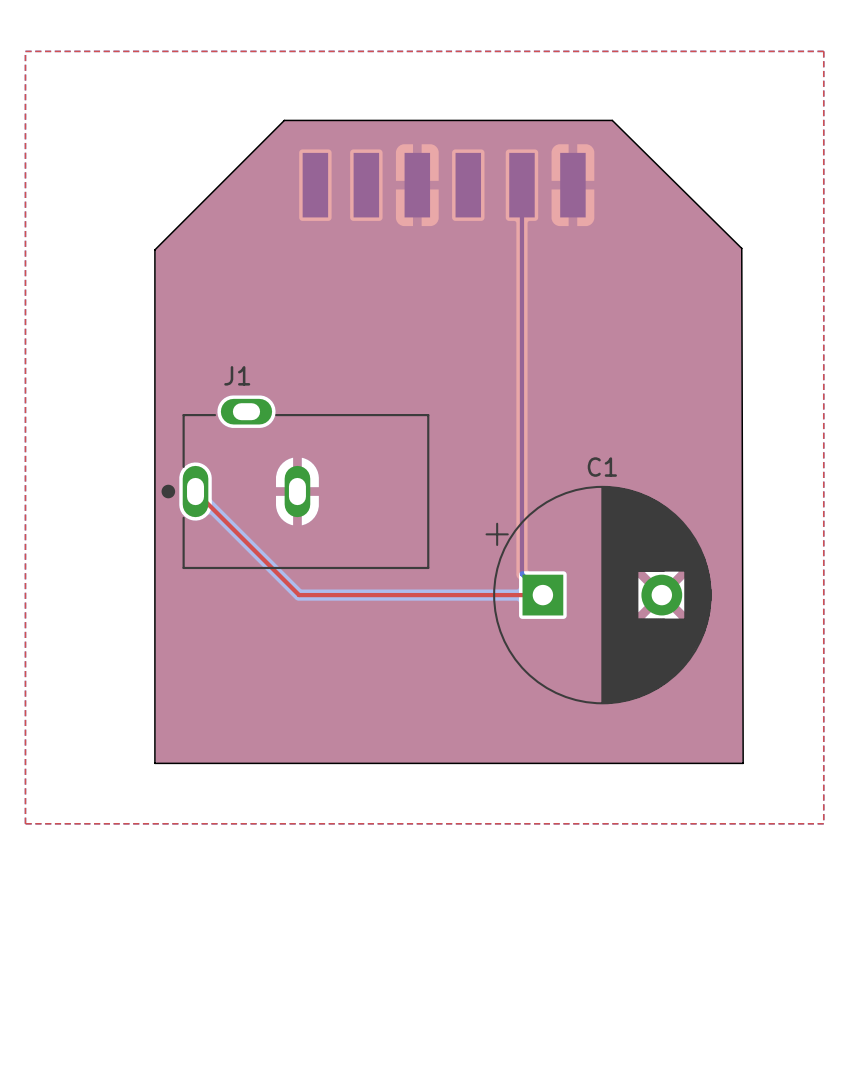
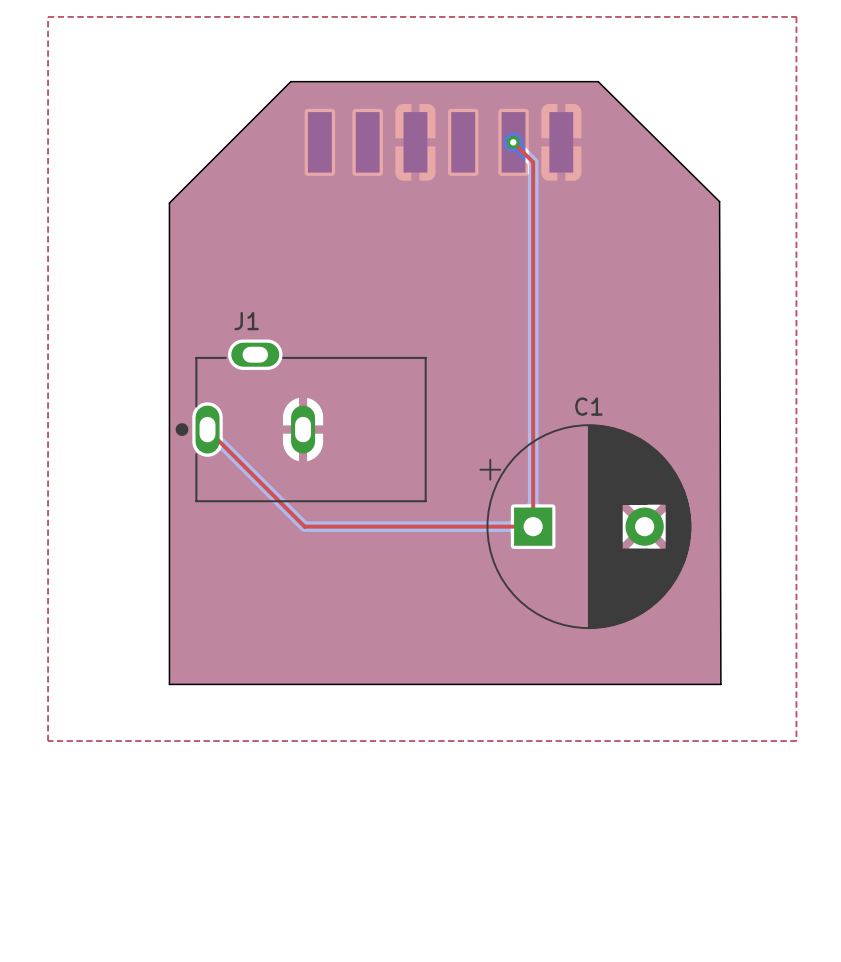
top track: none -> (513, 142) (533, 162) (533, 526)
bottom track: (521, 185) (521, 574) (542, 595) -> none
via: none -> (513, 142)

